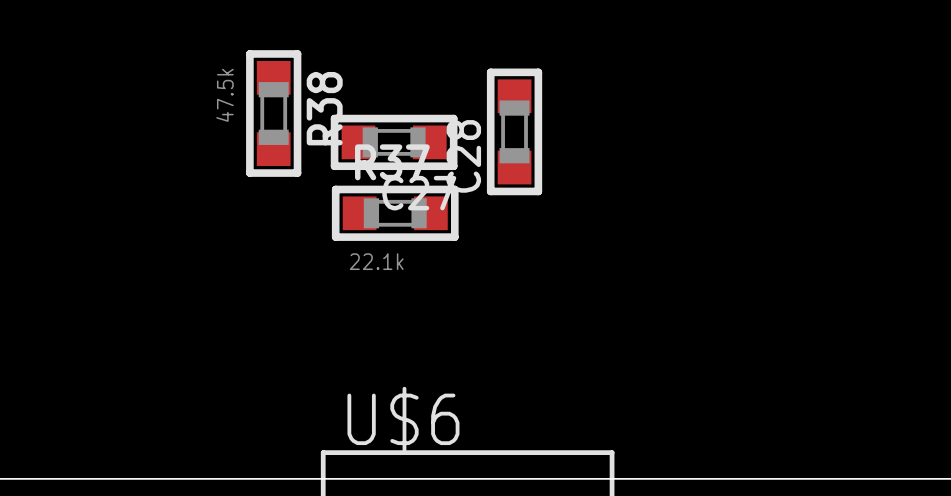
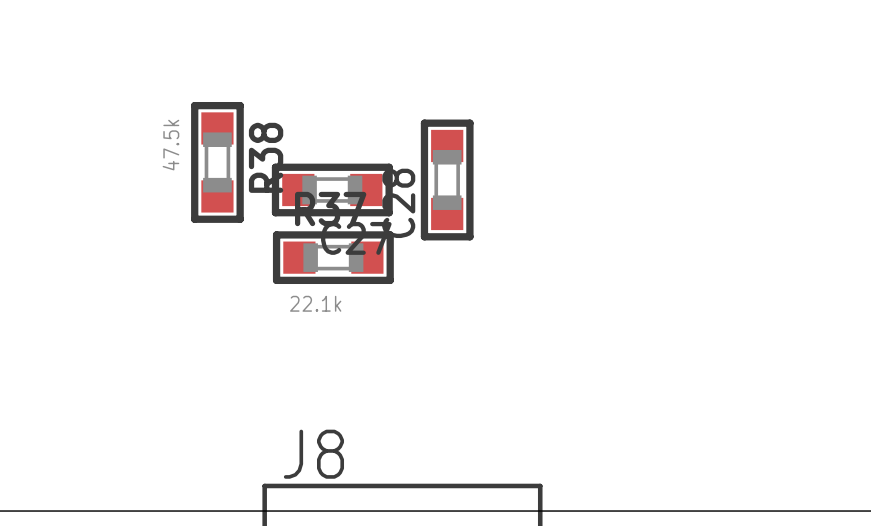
U$6 name: U$6 (403, 419) -> J8 (313, 454)

